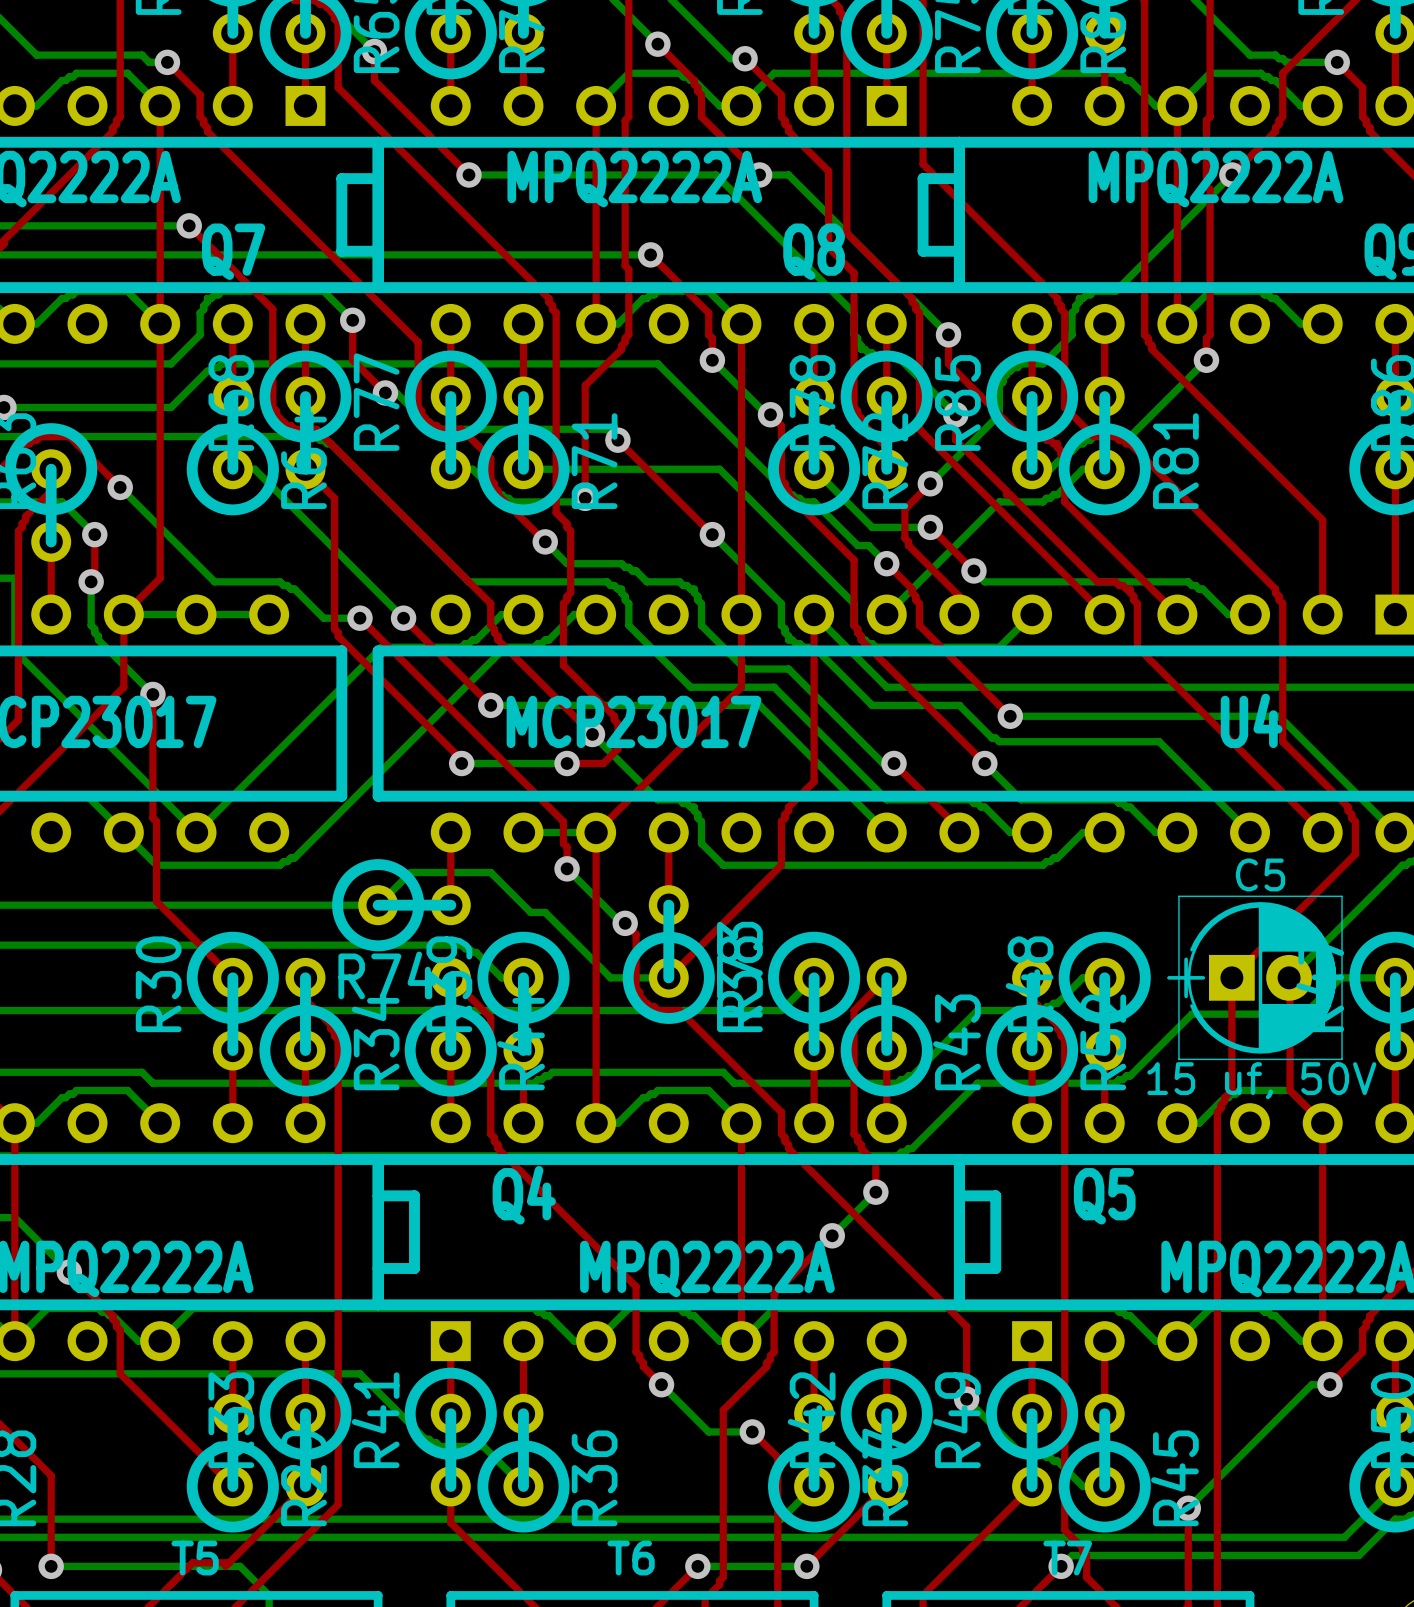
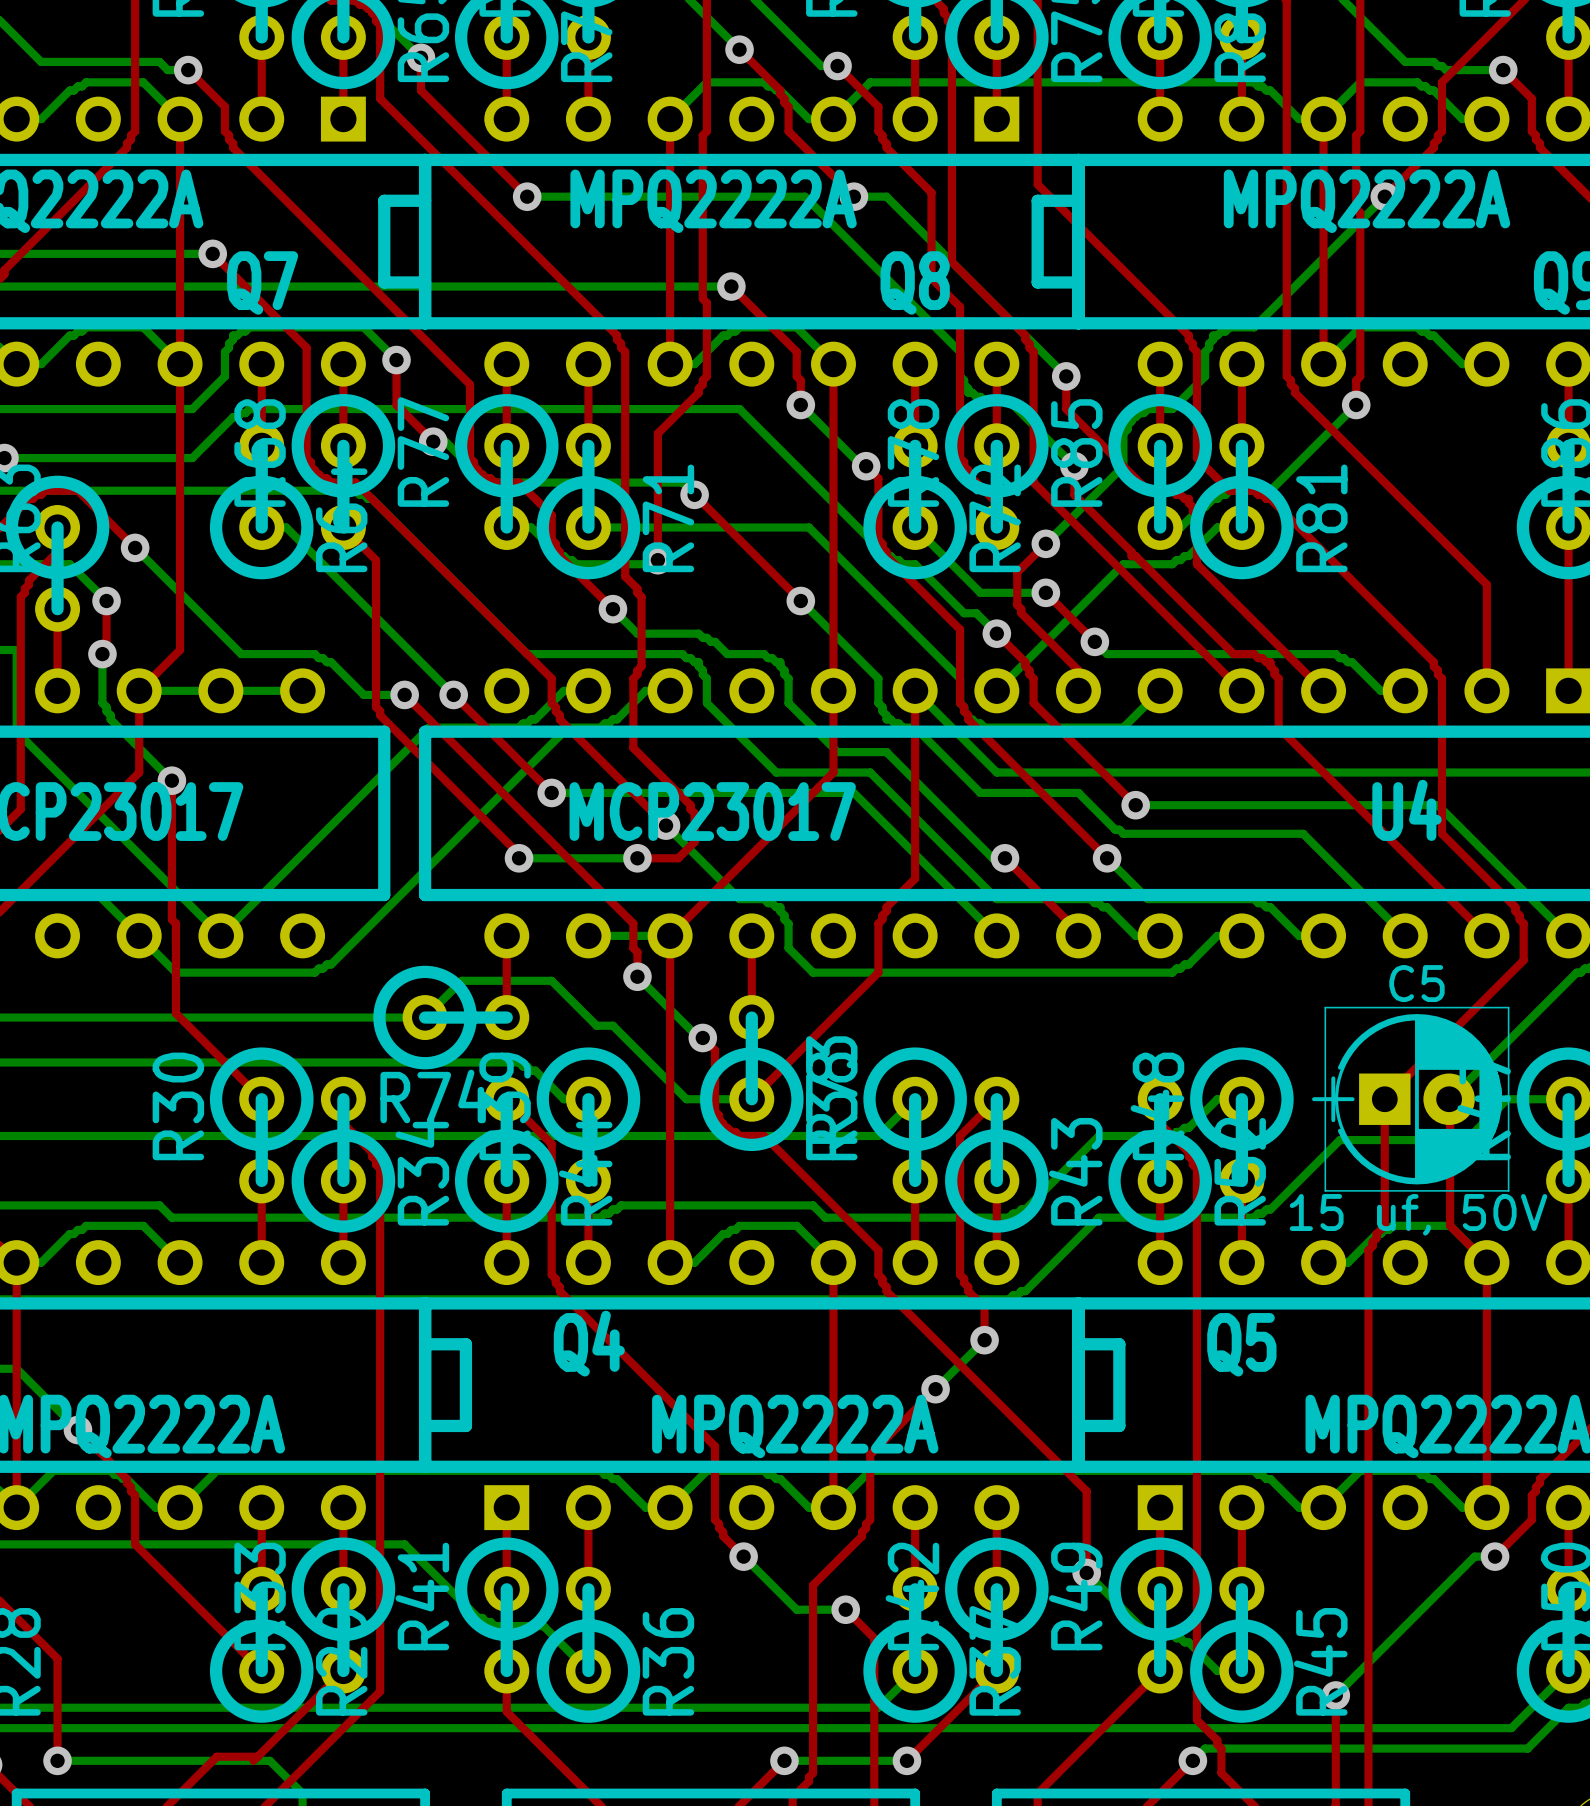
T5 name: T5 (195, 1558) -> none
T6 name: T6 (631, 1558) -> none
T7 name: T7 (1067, 1558) -> none

